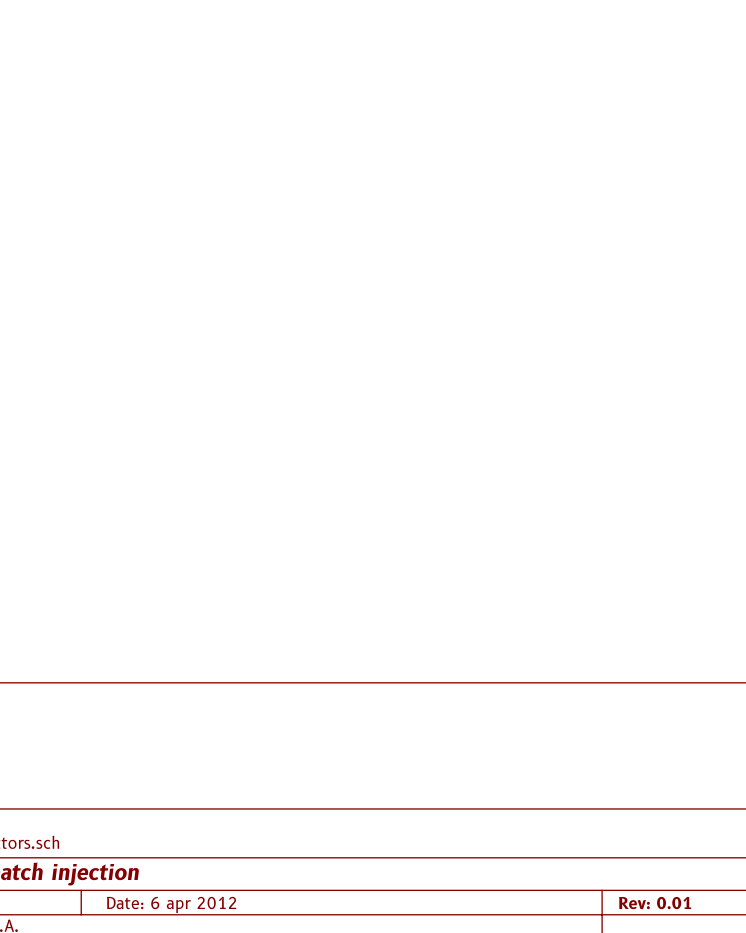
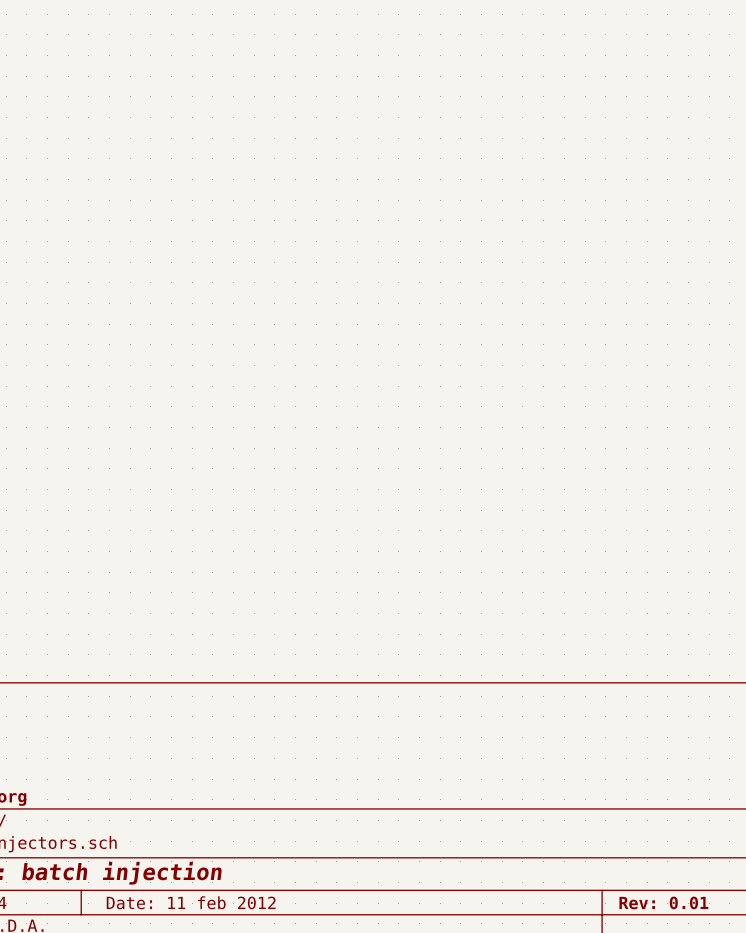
title block: Date: 6 apr 2012 (171, 904) -> Date: 11 feb 2012 (191, 902)

